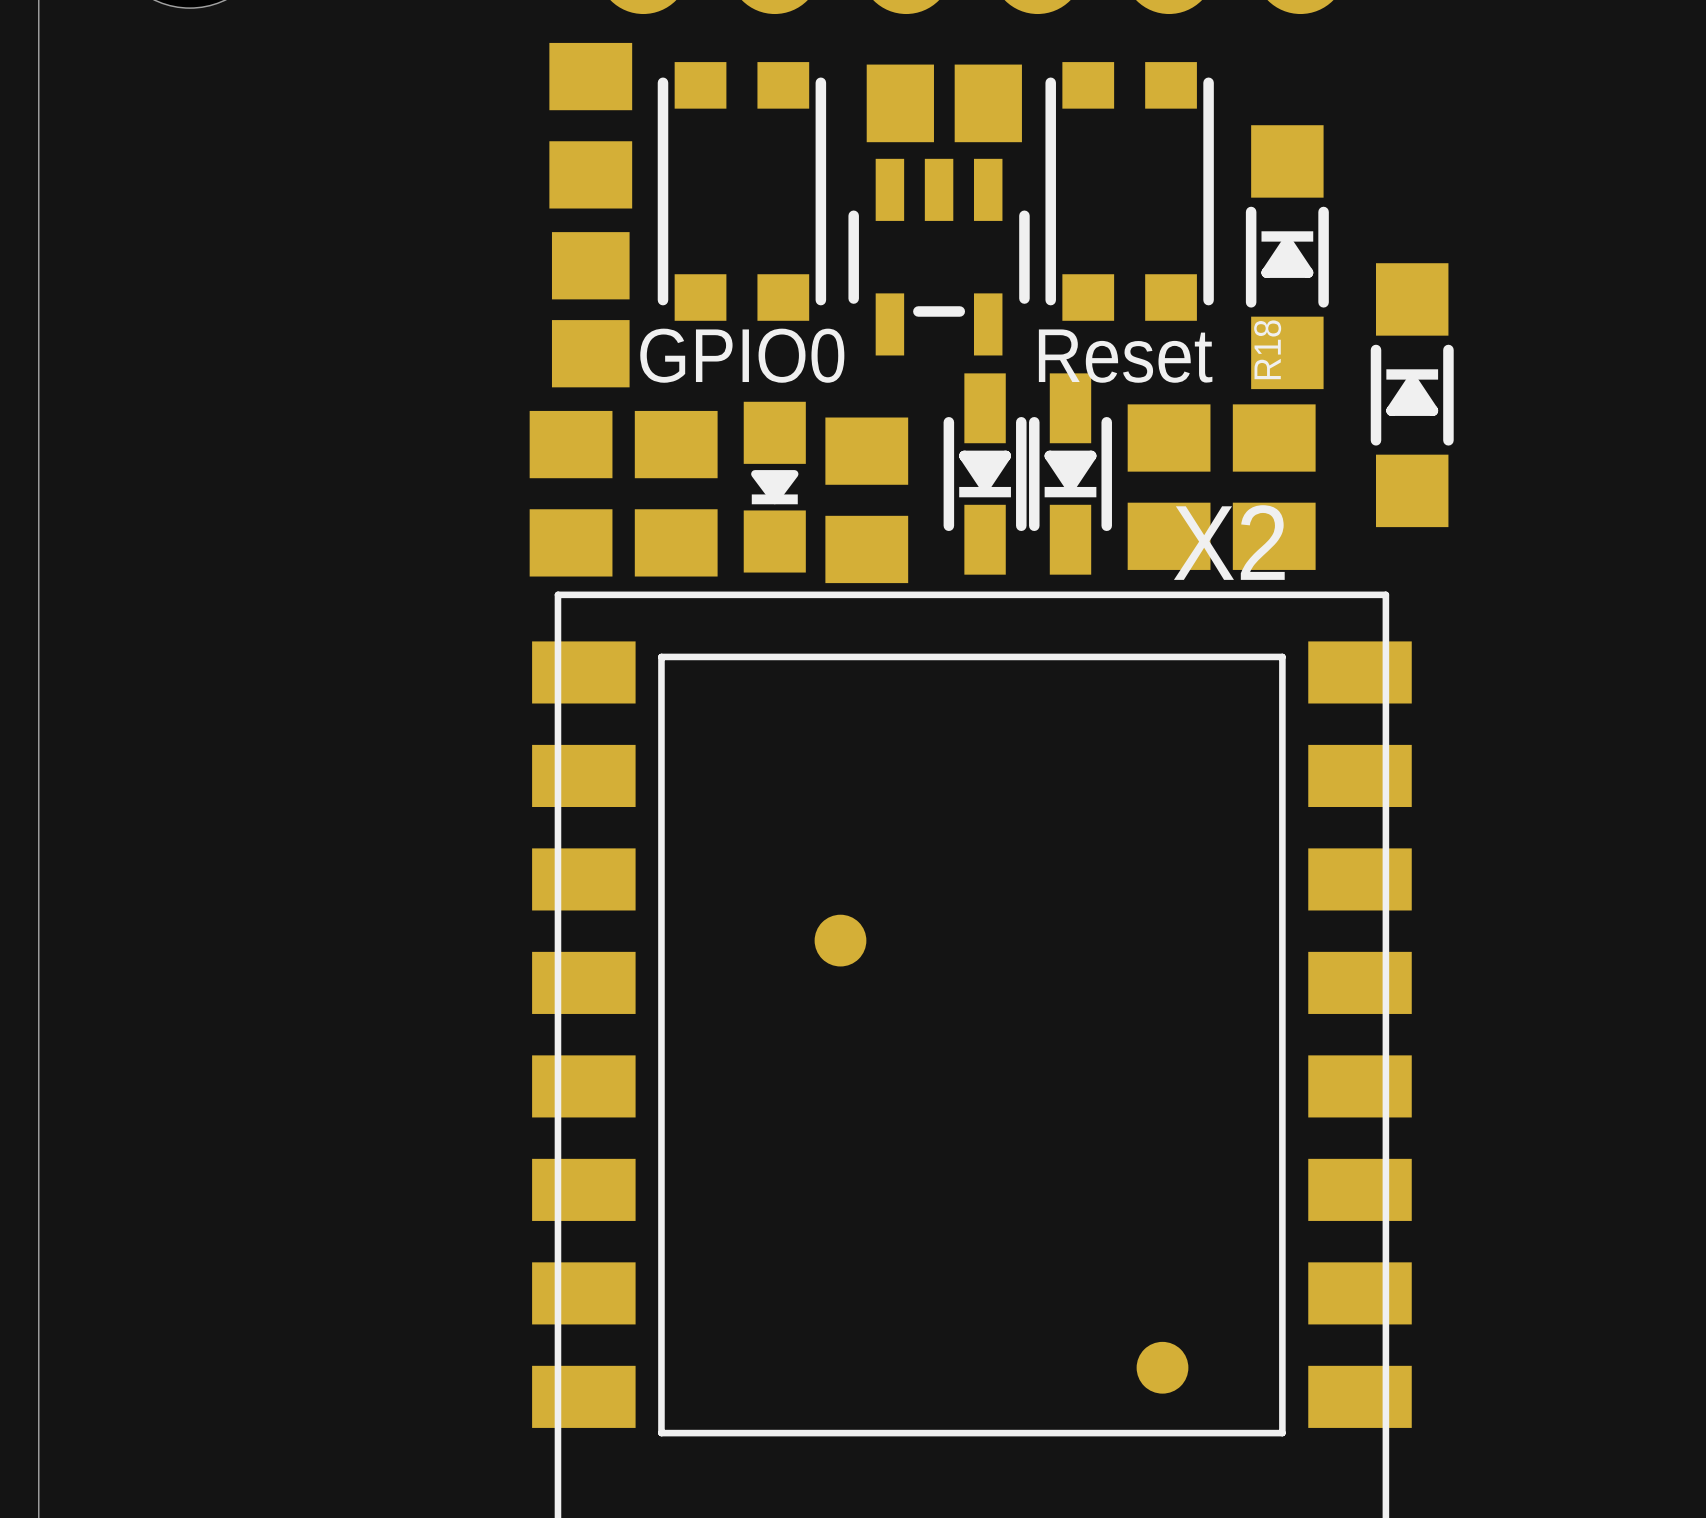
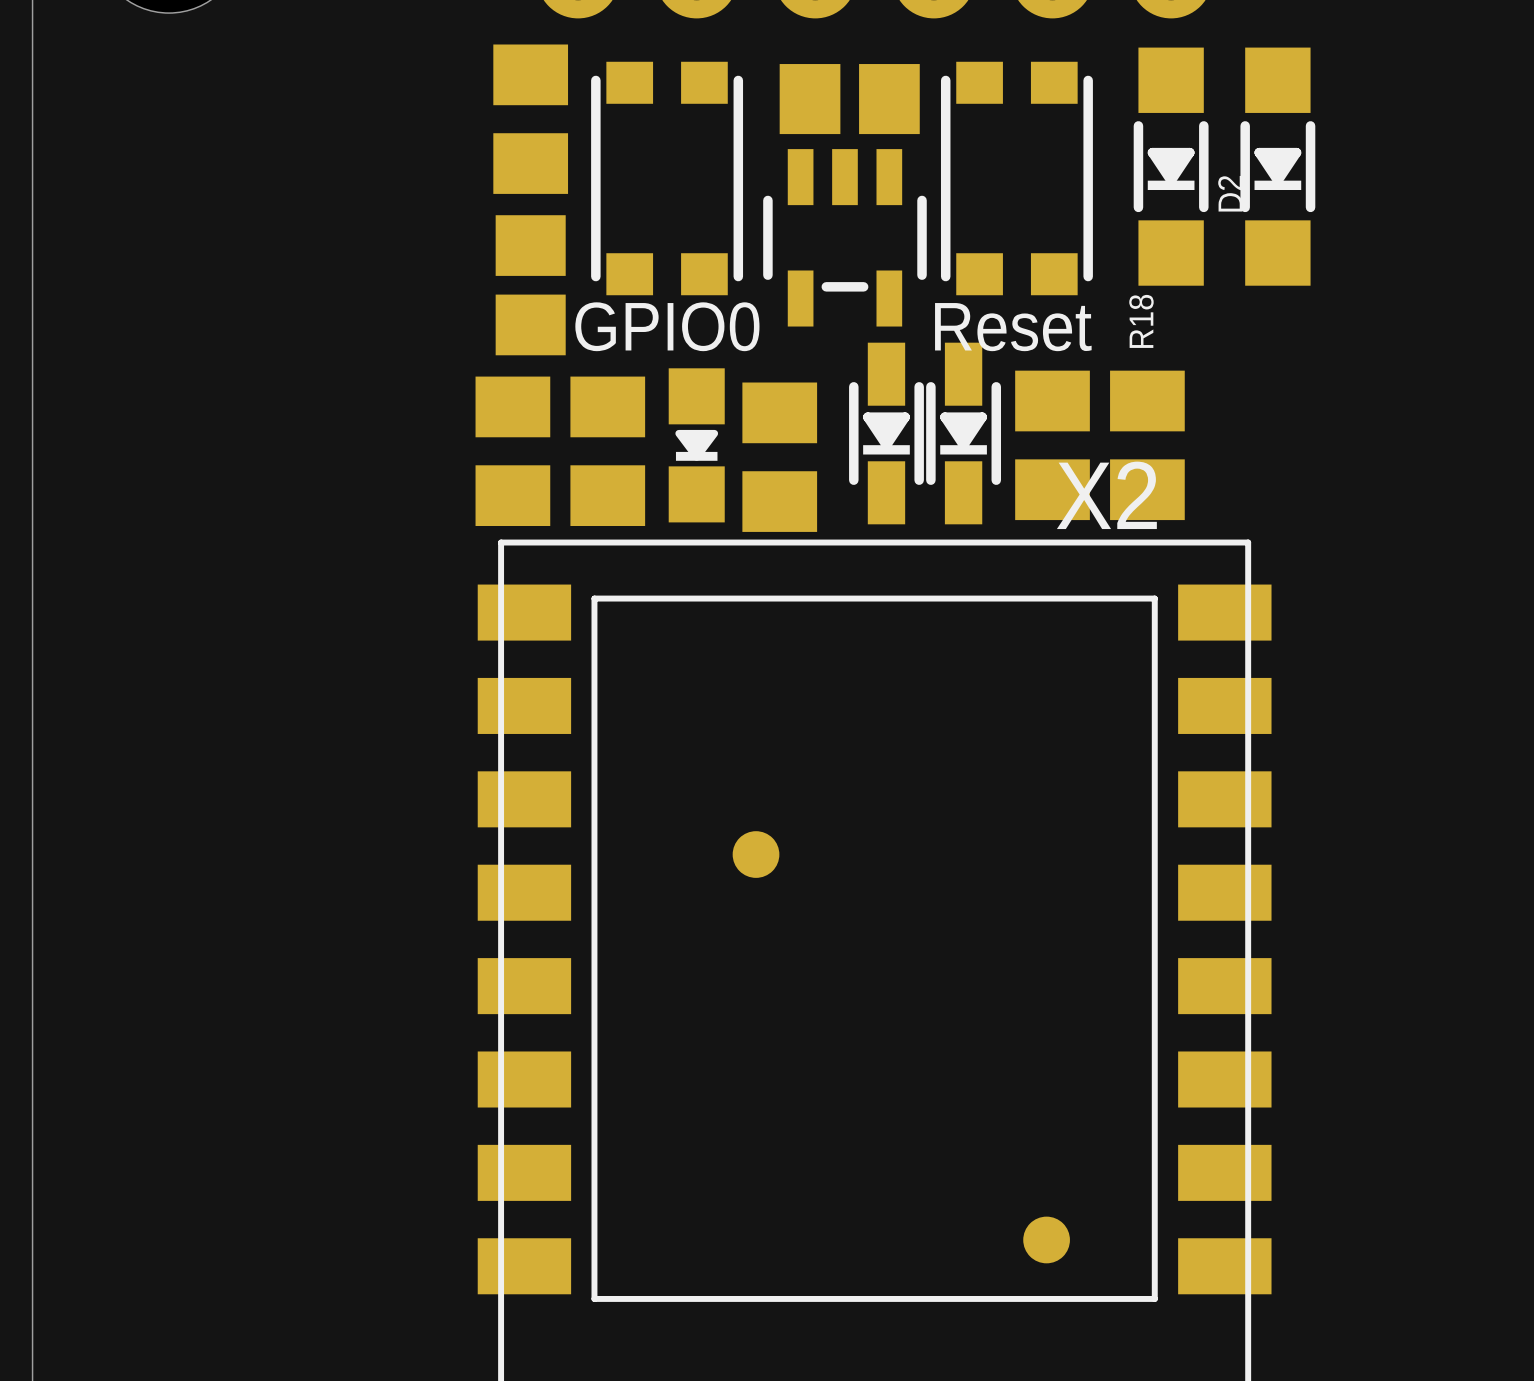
D2: none -> (1277, 166)
part rotation: 0° (1287, 257) -> 180° (1171, 166)
part: (1412, 395) -> none

